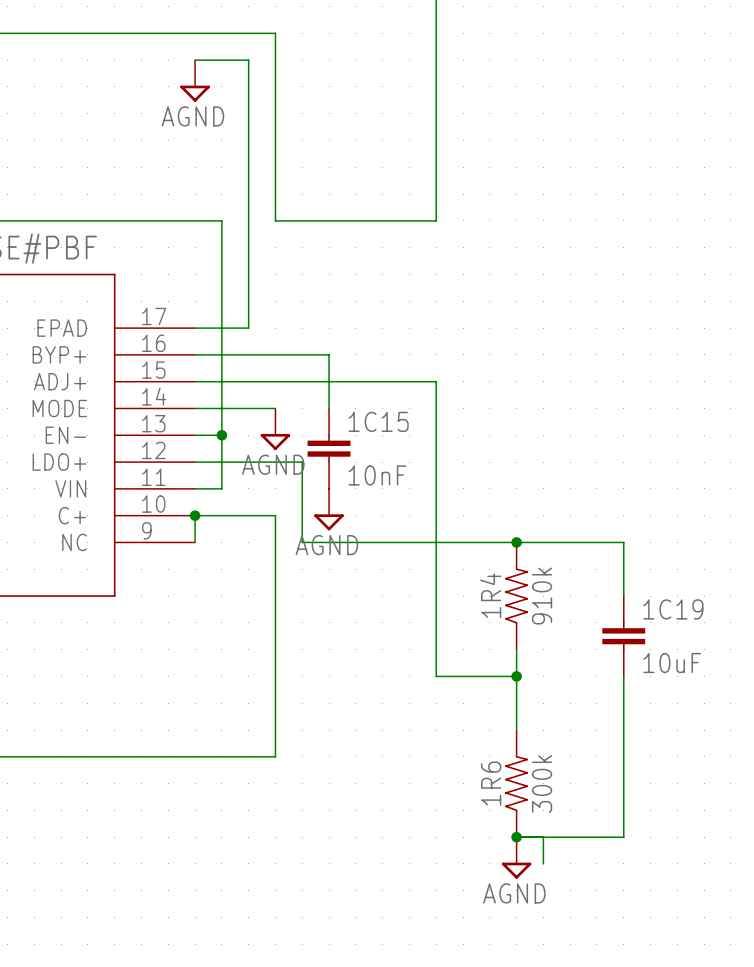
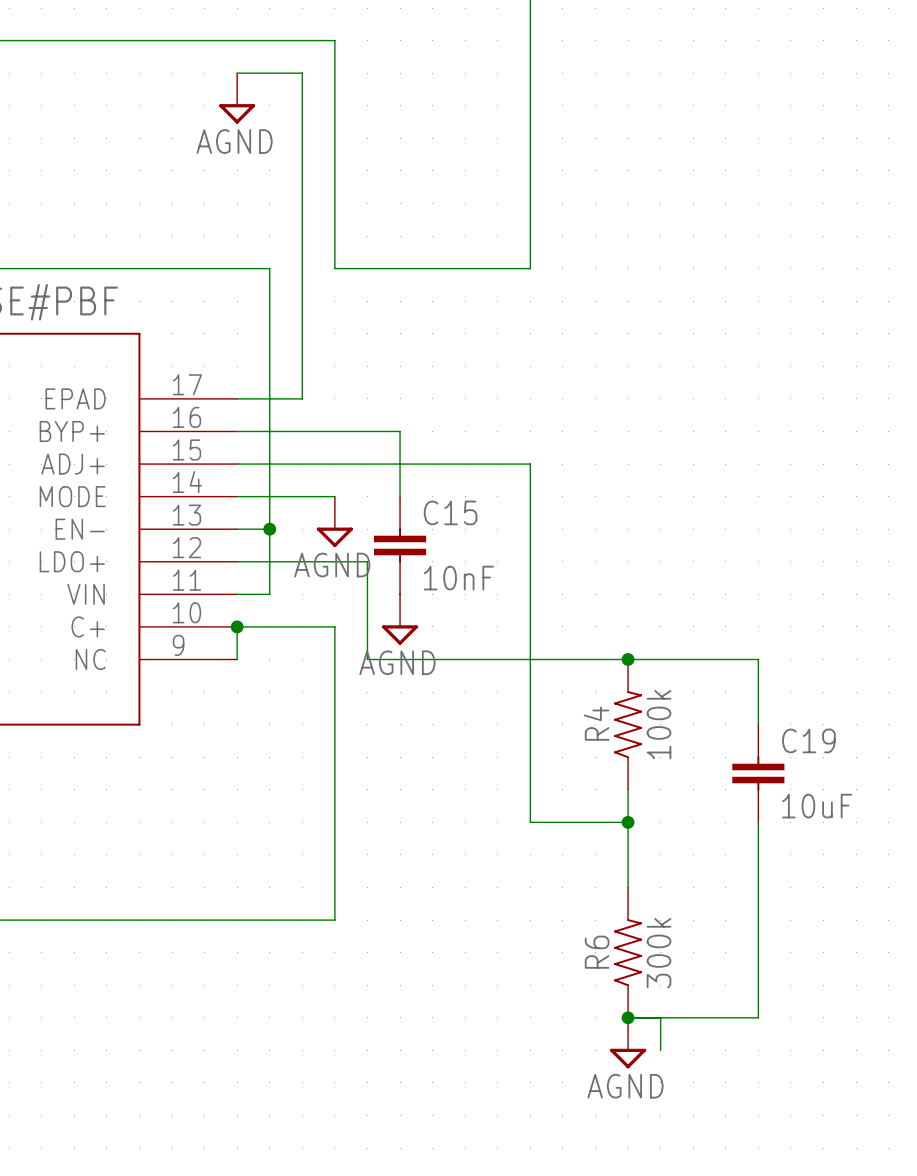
1C15 name: 1C15 (378, 421) -> C15 (450, 512)
1R4 name: 1R4 (490, 595) -> R4 (596, 723)
1R4 value: 910k (542, 596) -> 100k (659, 724)
1C19 name: 1C19 (673, 609) -> C19 (808, 740)
1R6 name: 1R6 (491, 783) -> R6 (597, 952)

